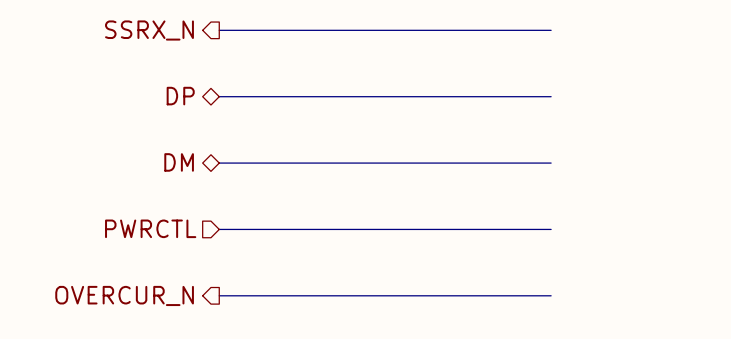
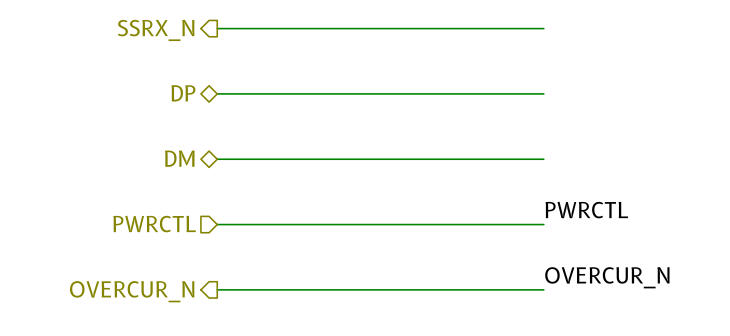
label: none -> PWRCTL (586, 210)
label: none -> OVERCUR_N (607, 277)

